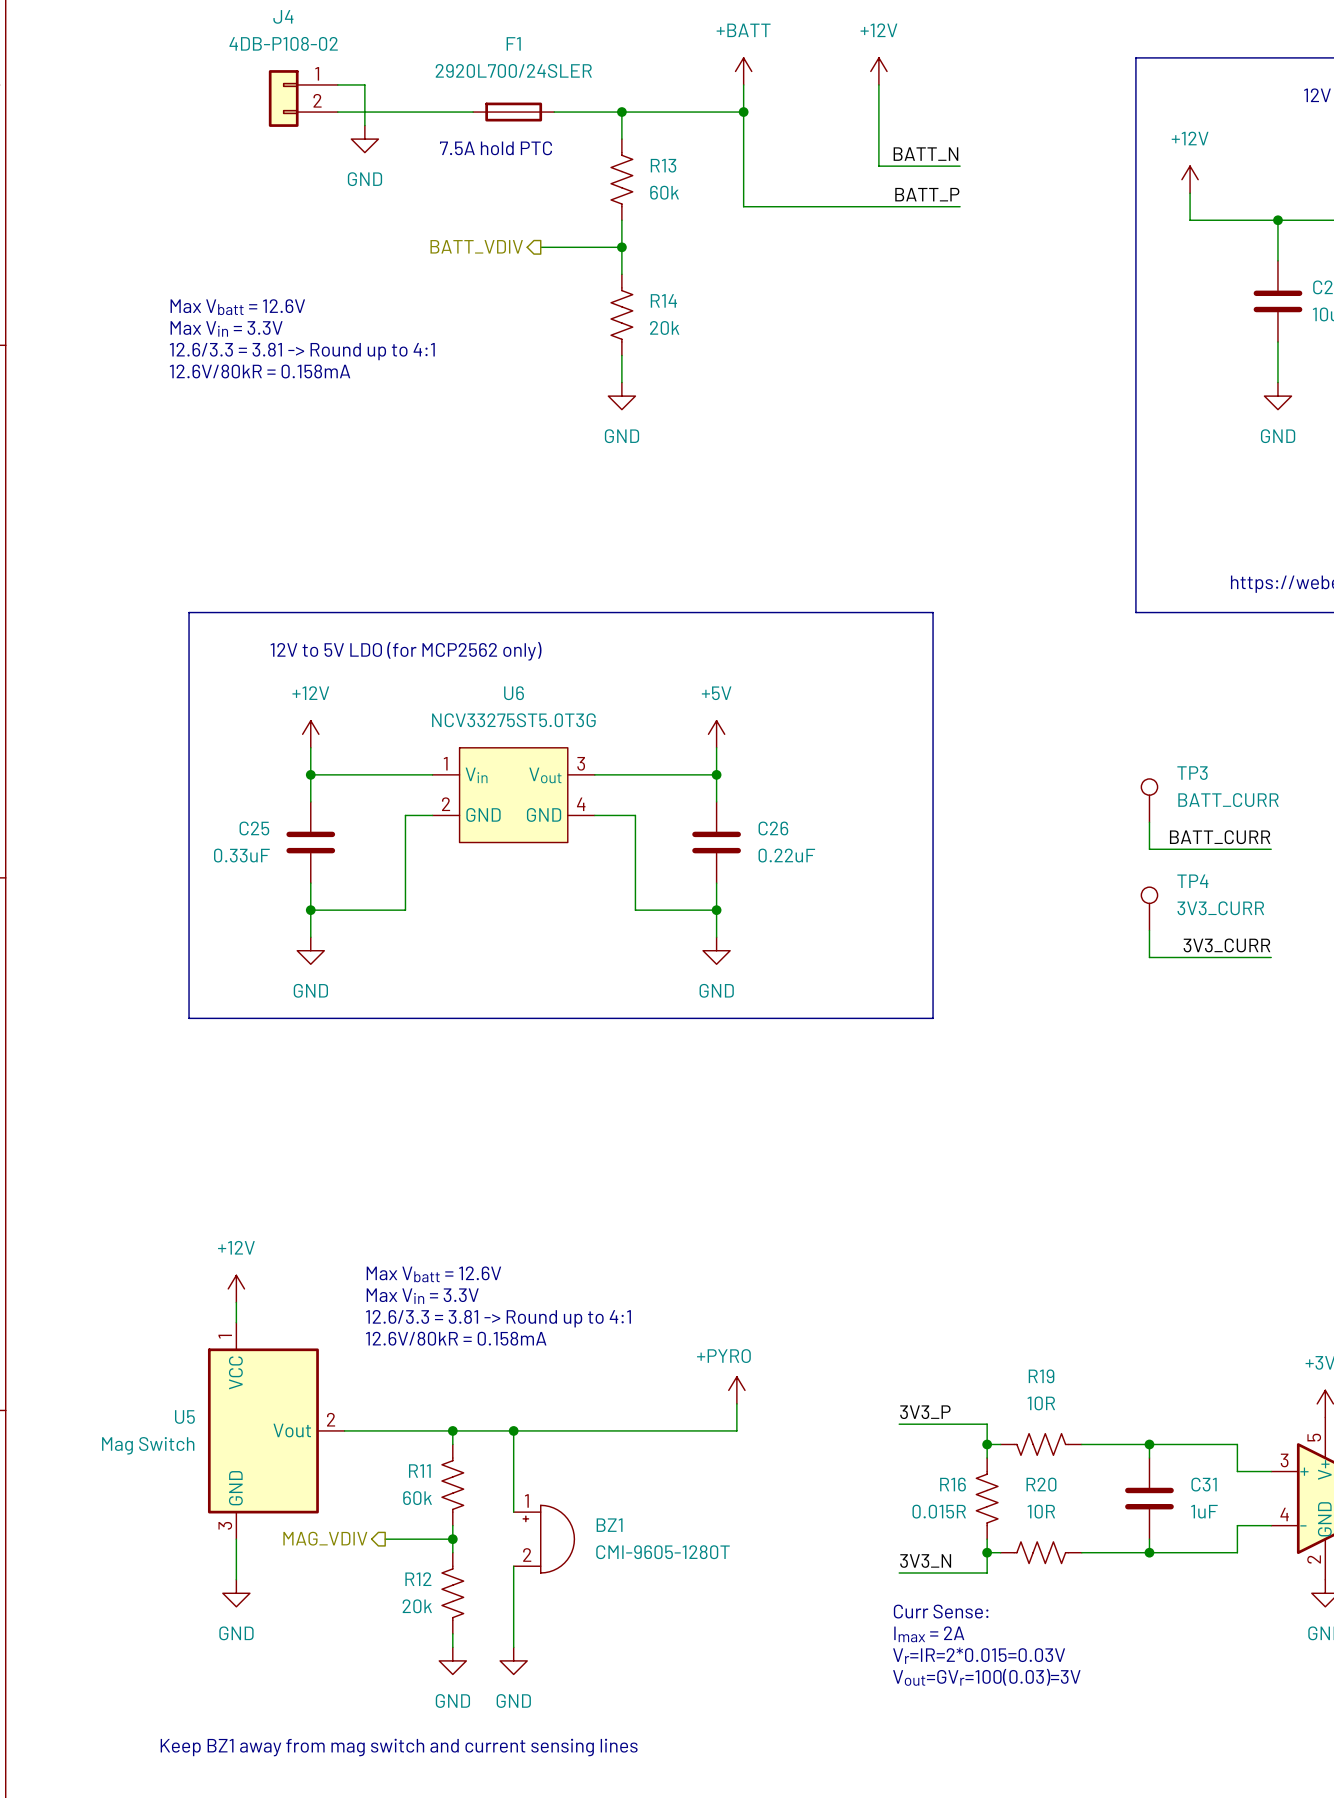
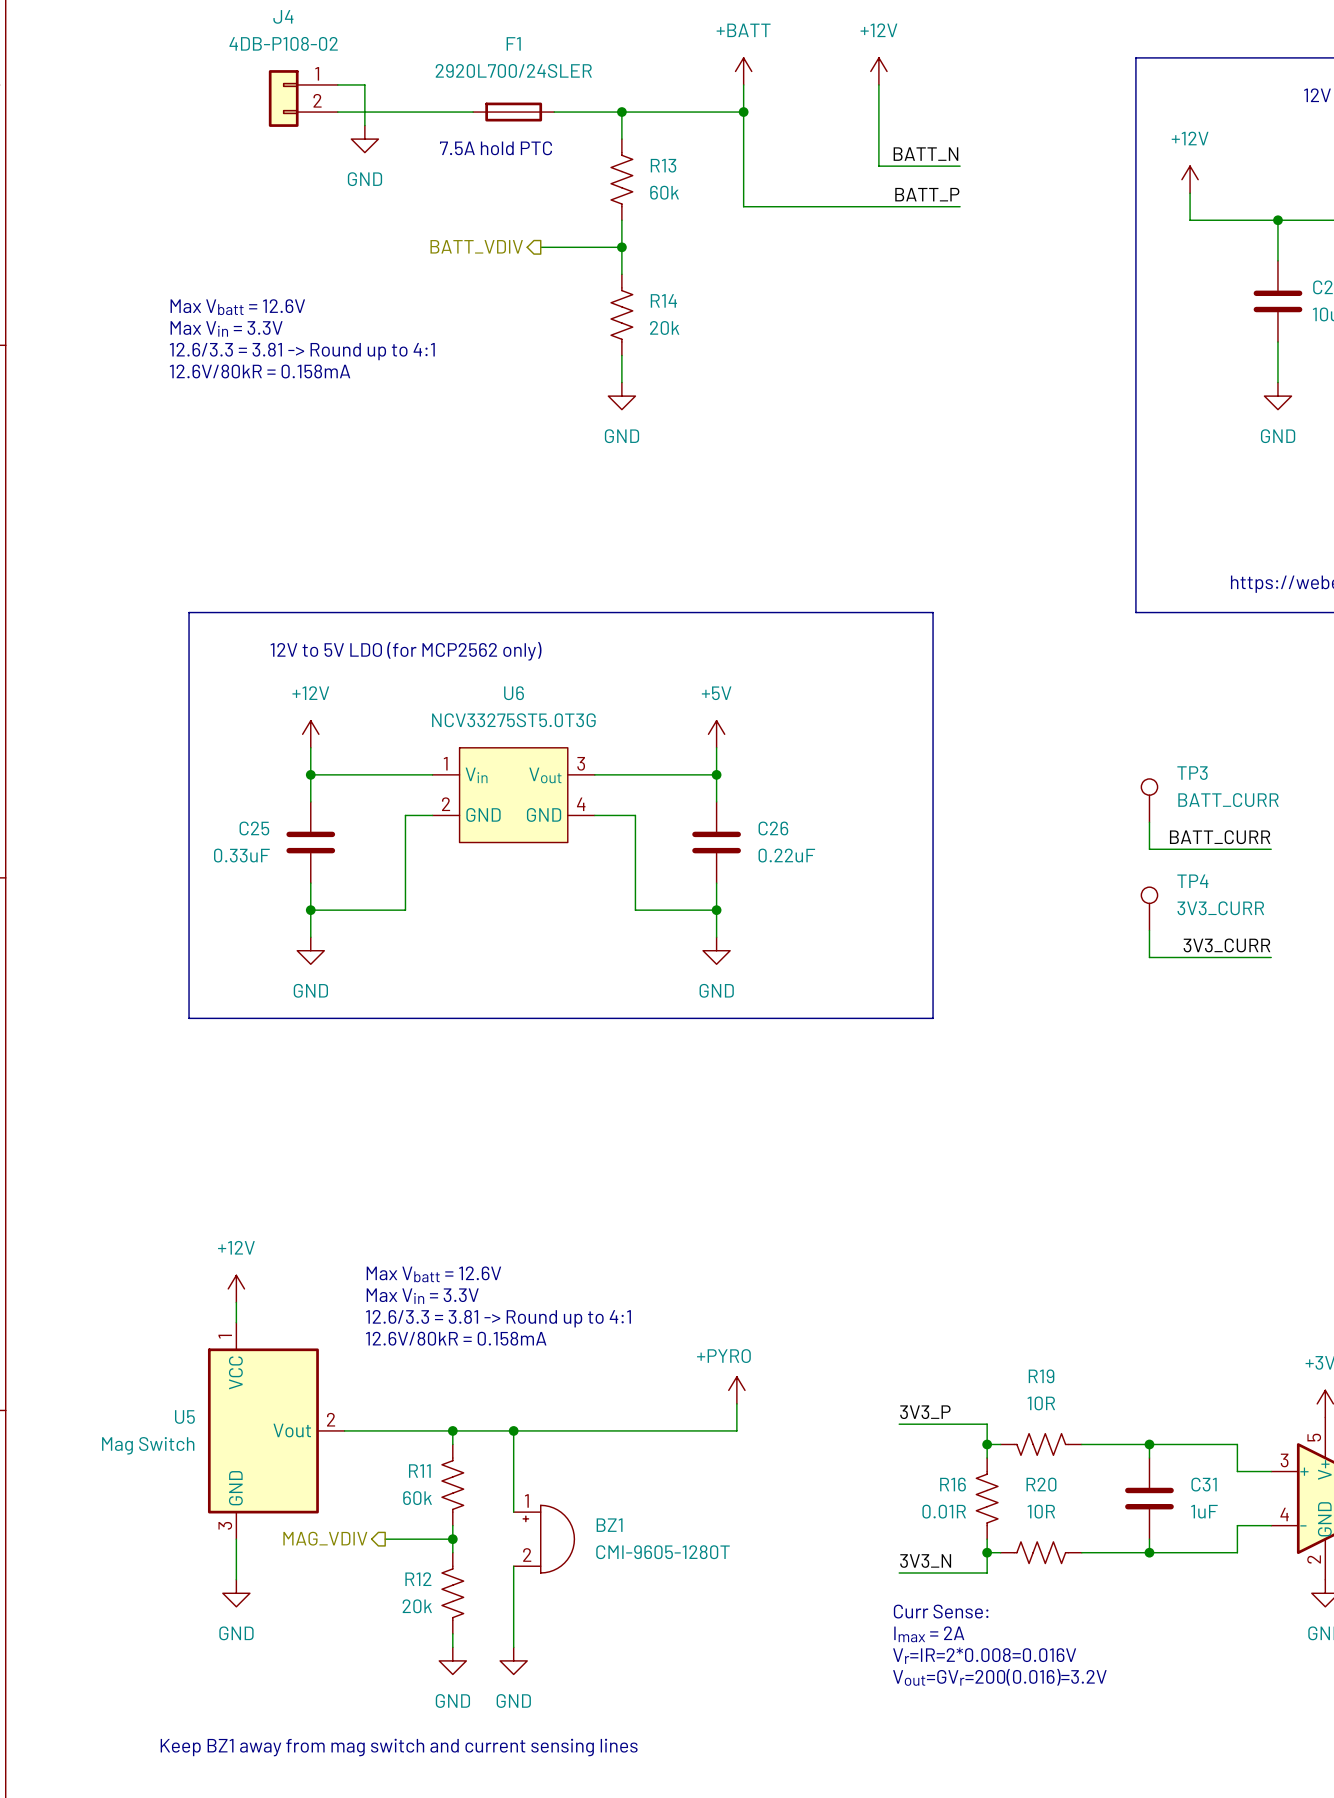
R16 value: 0.015R (939, 1511) -> 0.01R (944, 1511)
text: Vr=IR=2*0.015=0.03V (979, 1655) -> Vr=IR=2*0.008=0.016V (984, 1655)
text: Vout=GVr=100(0.03)=3V (986, 1677) -> Vout=GVr=200(0.016)=3.2V (999, 1677)

